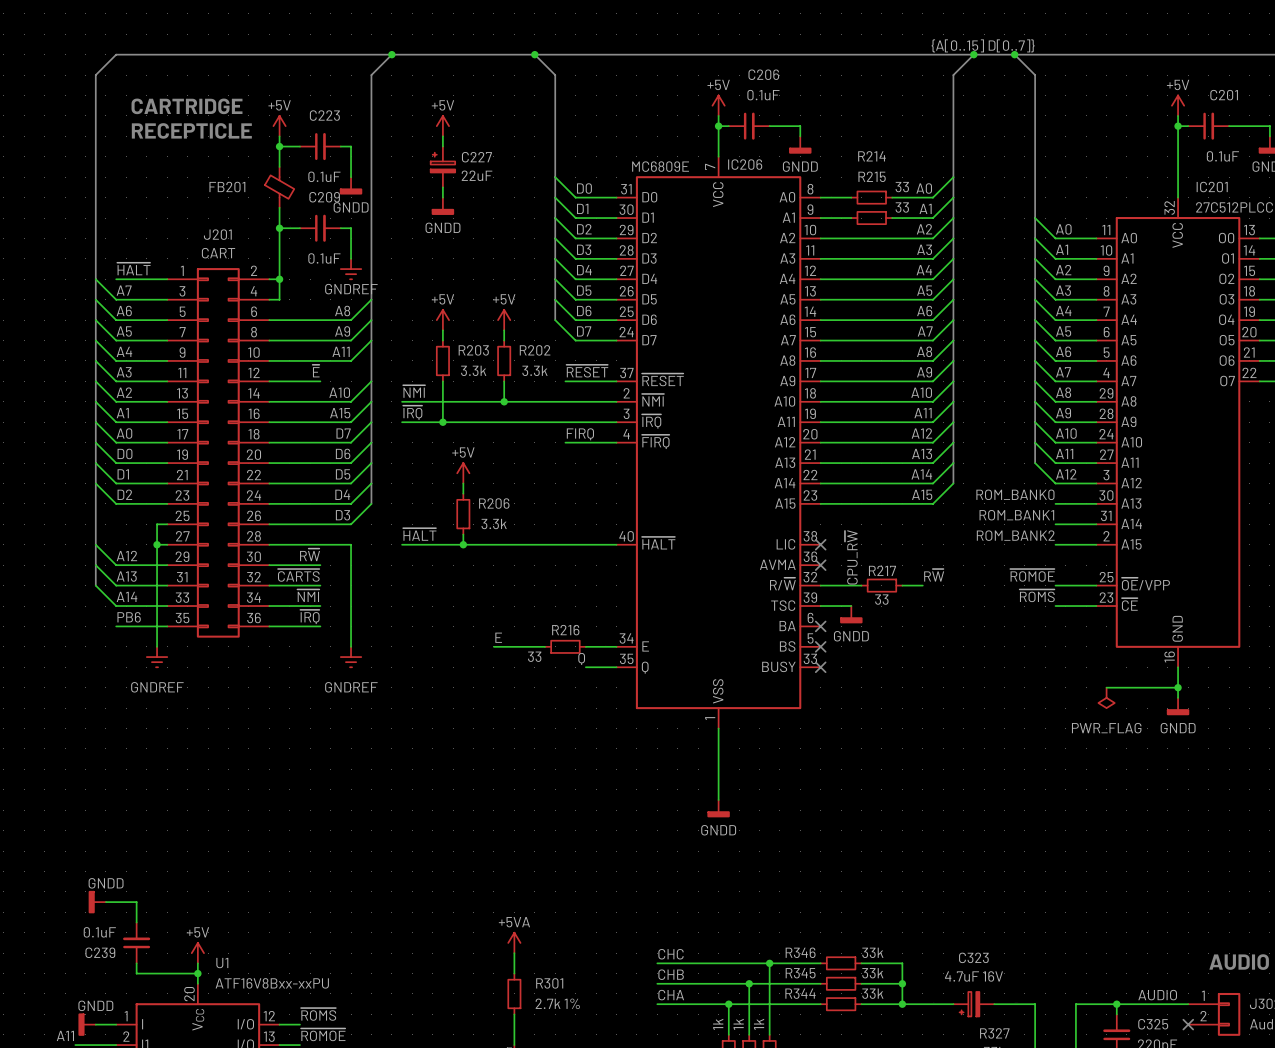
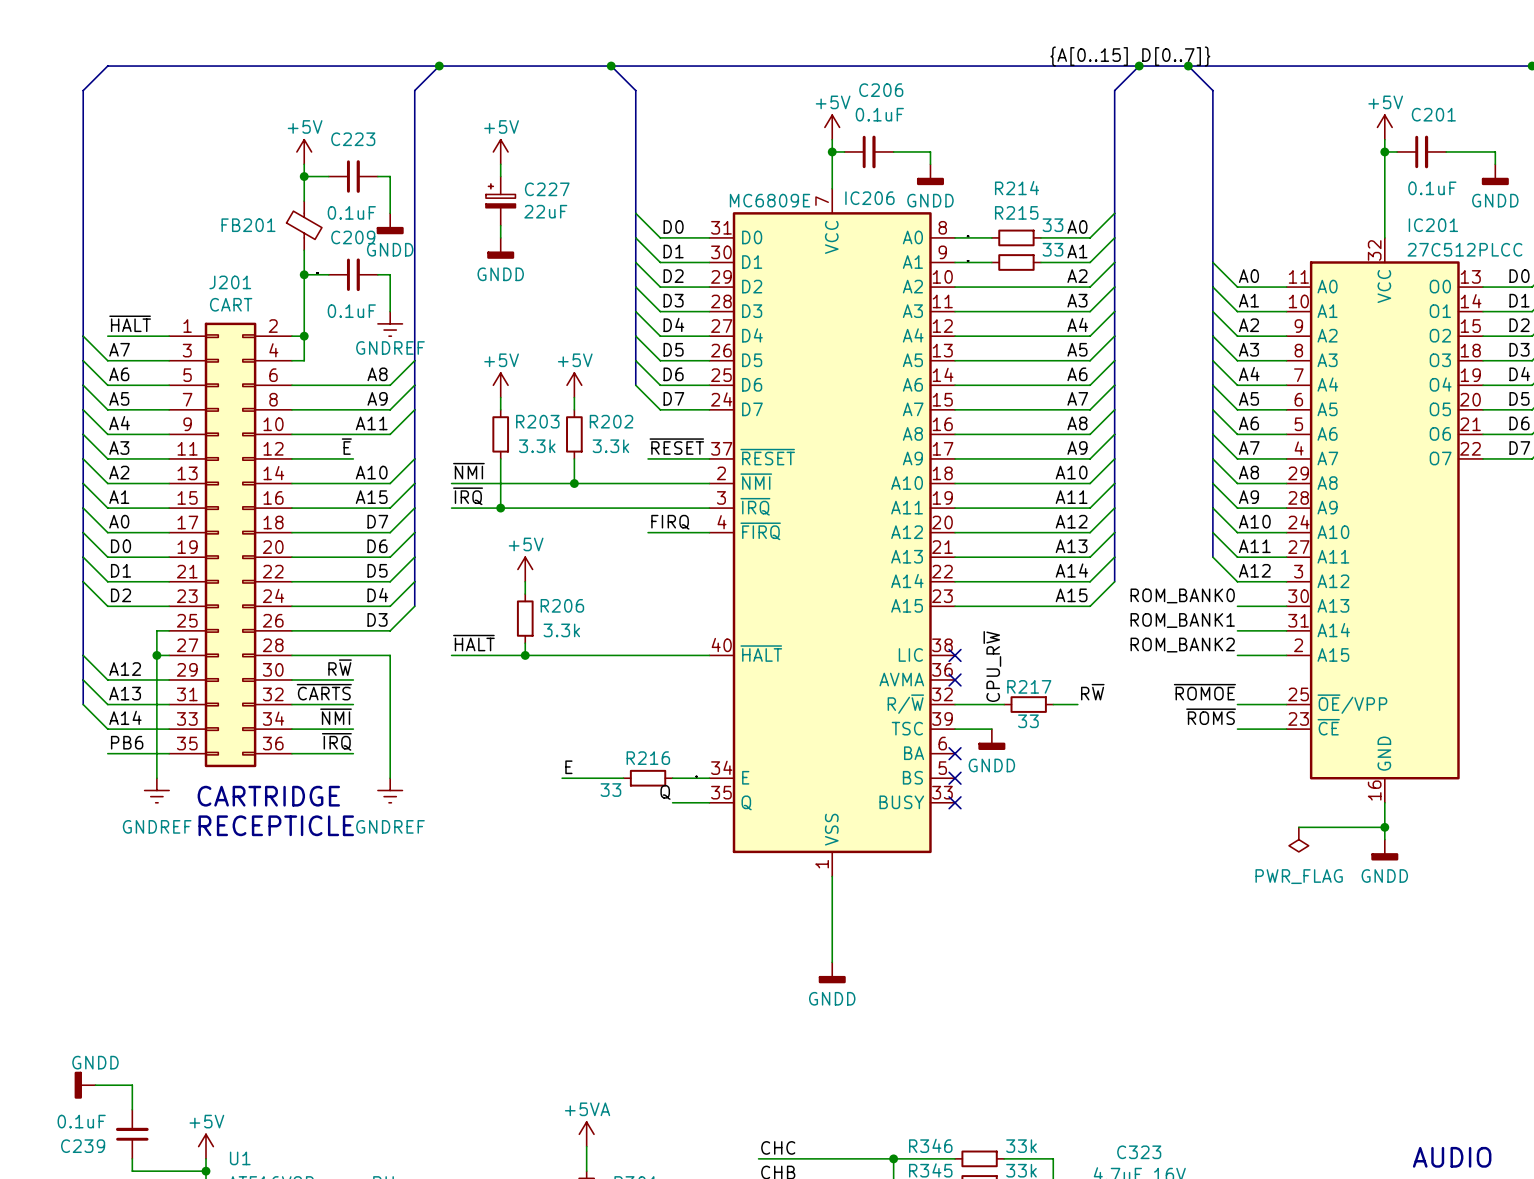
text: CARTRIDGE (187, 106) -> none
text: RECEPTICLE (191, 130) -> none
text: none -> CARTRIDGE (268, 796)
text: none -> RECEPTICLE (276, 825)

